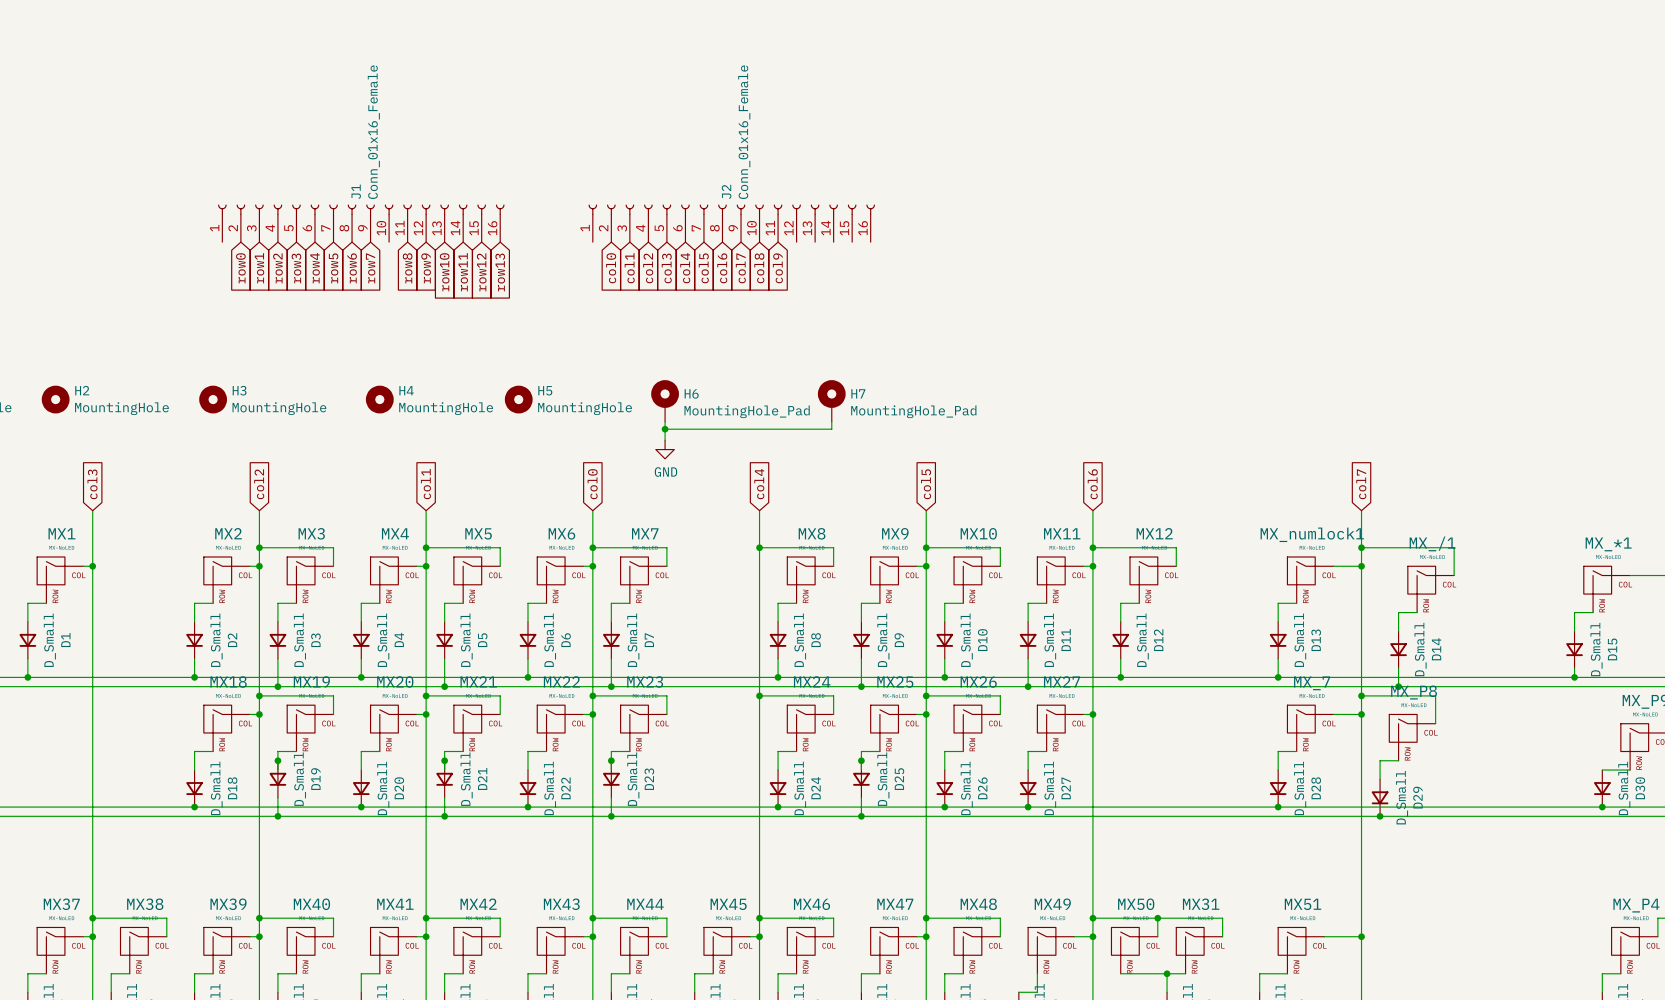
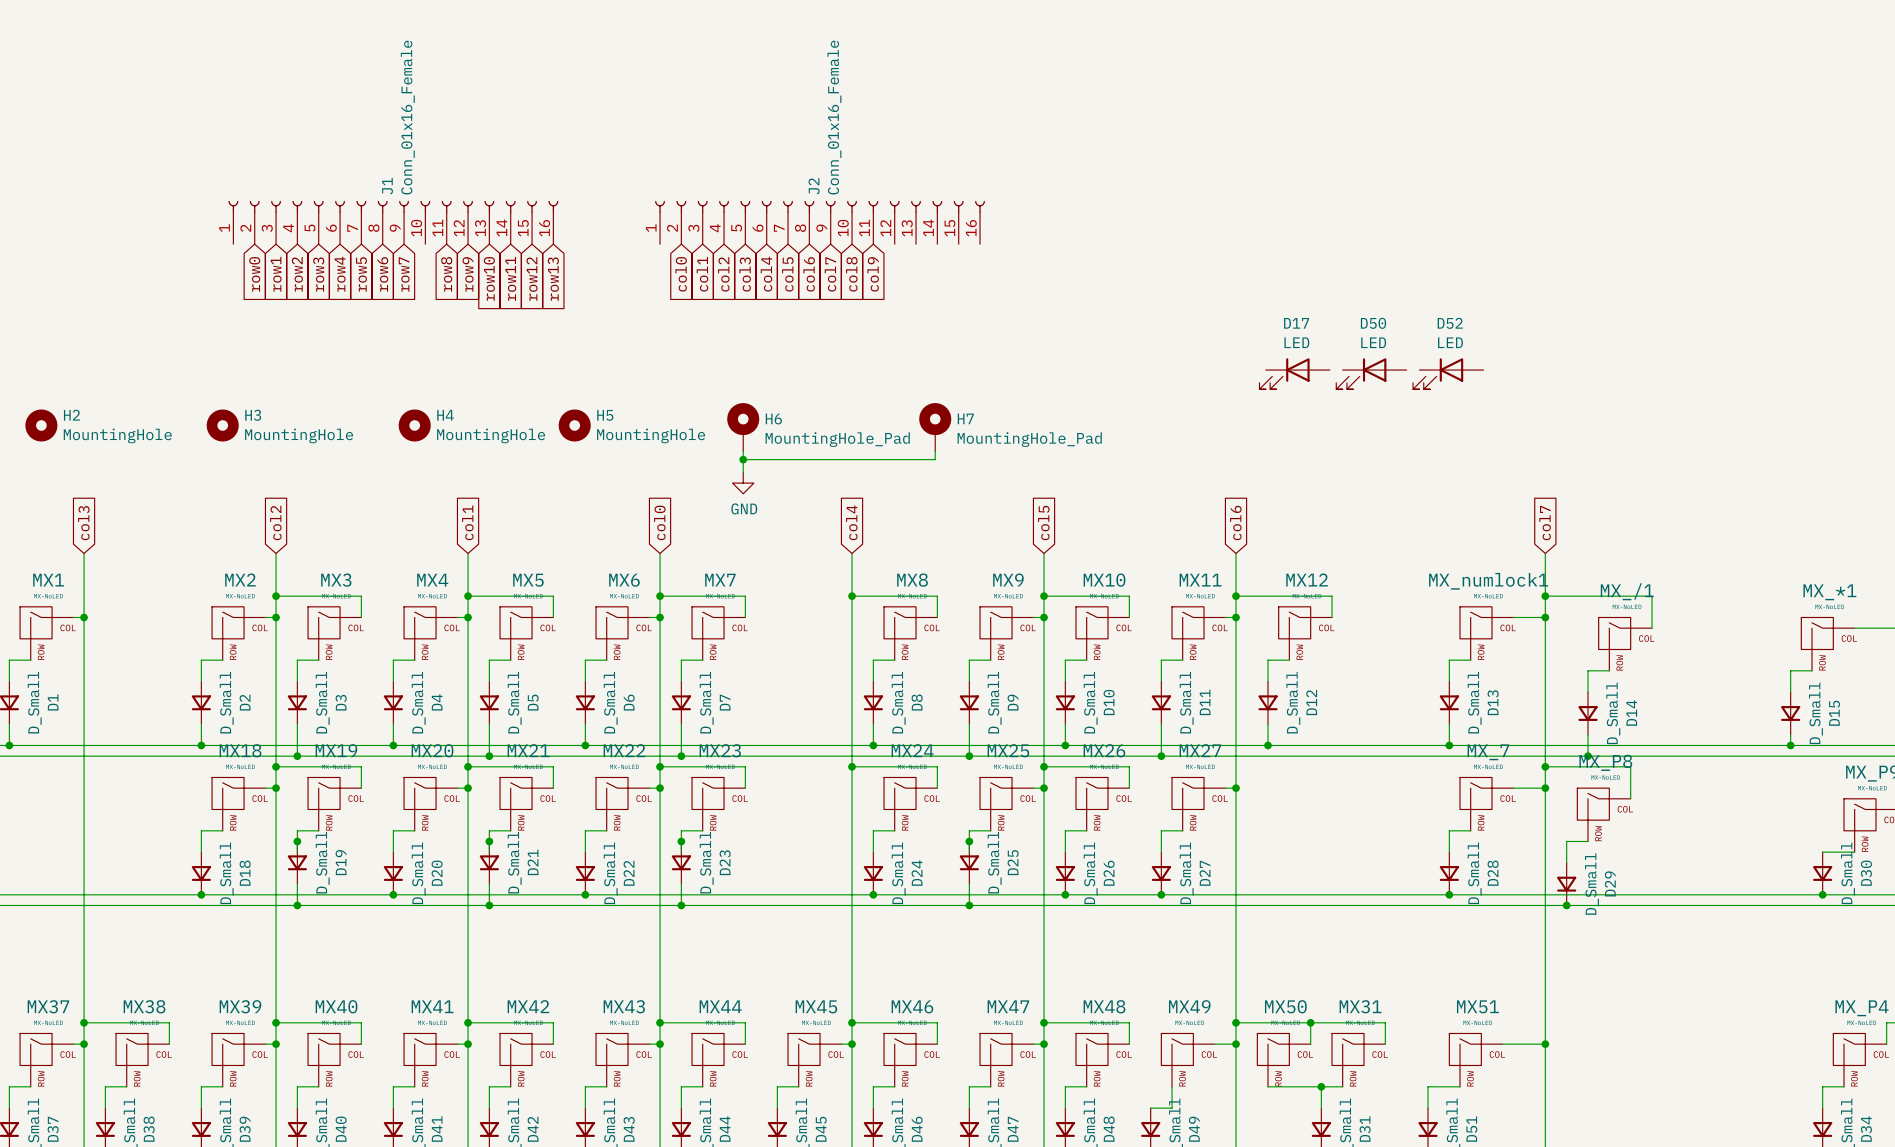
D17: none -> LED (1294, 373)
D50: none -> LED (1371, 373)
D52: none -> LED (1448, 373)

